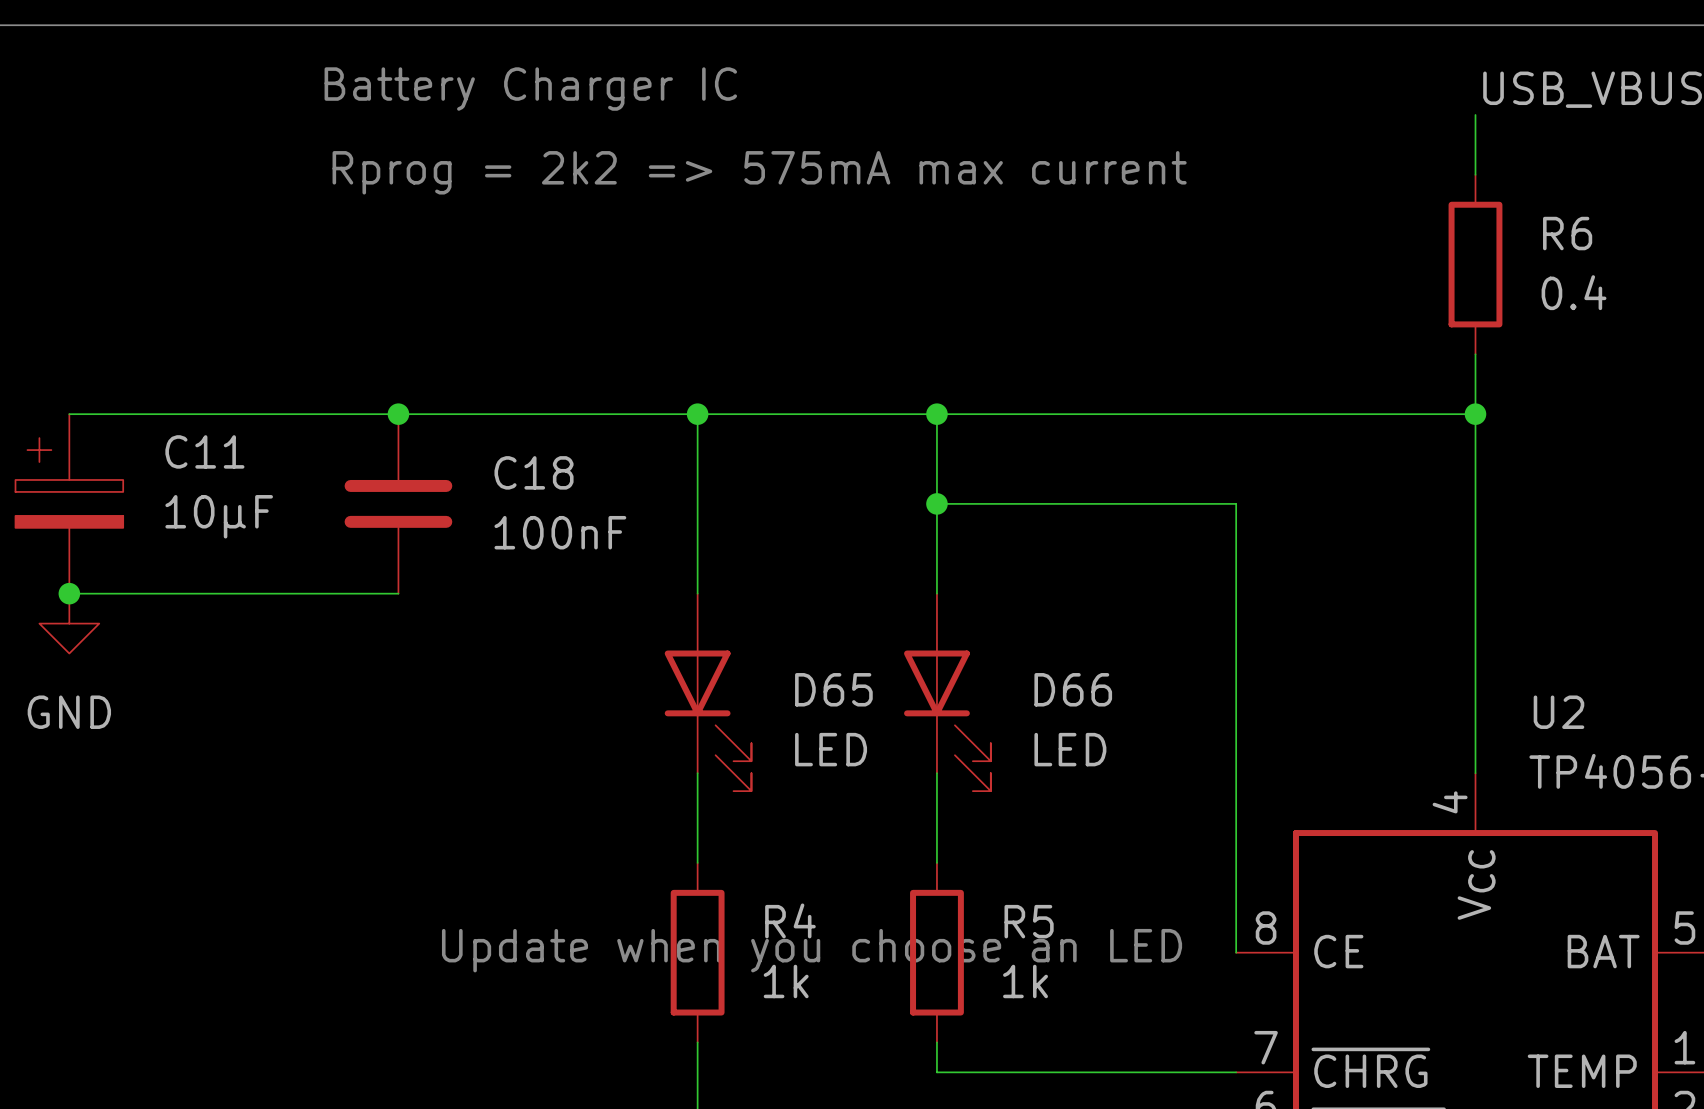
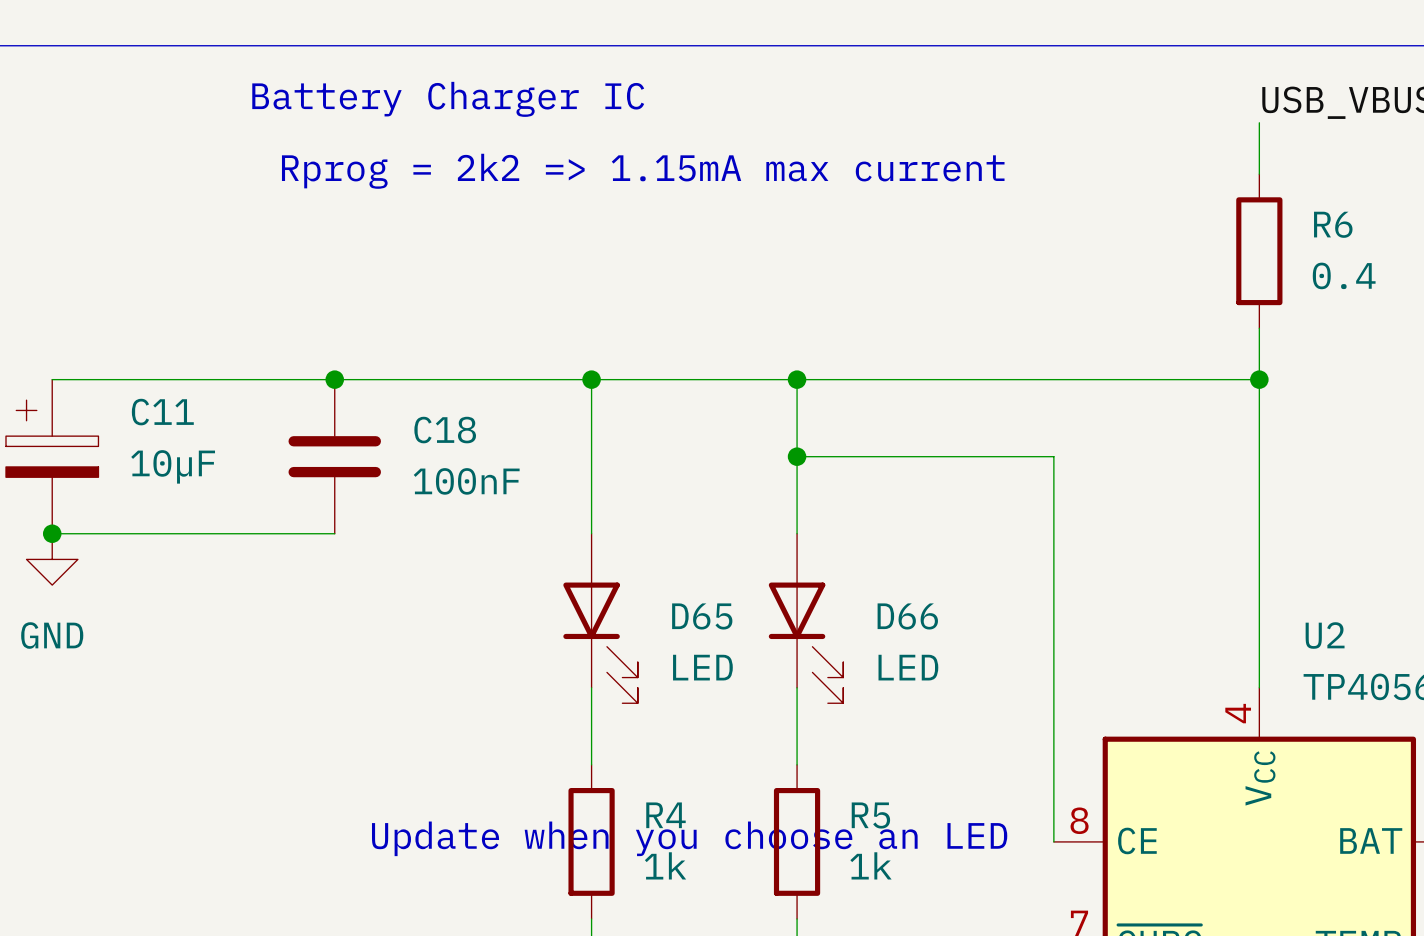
text: Rprog = 2k2 => 575mA max current (759, 172) -> Rprog = 2k2 => 1.15mA max current (643, 171)

